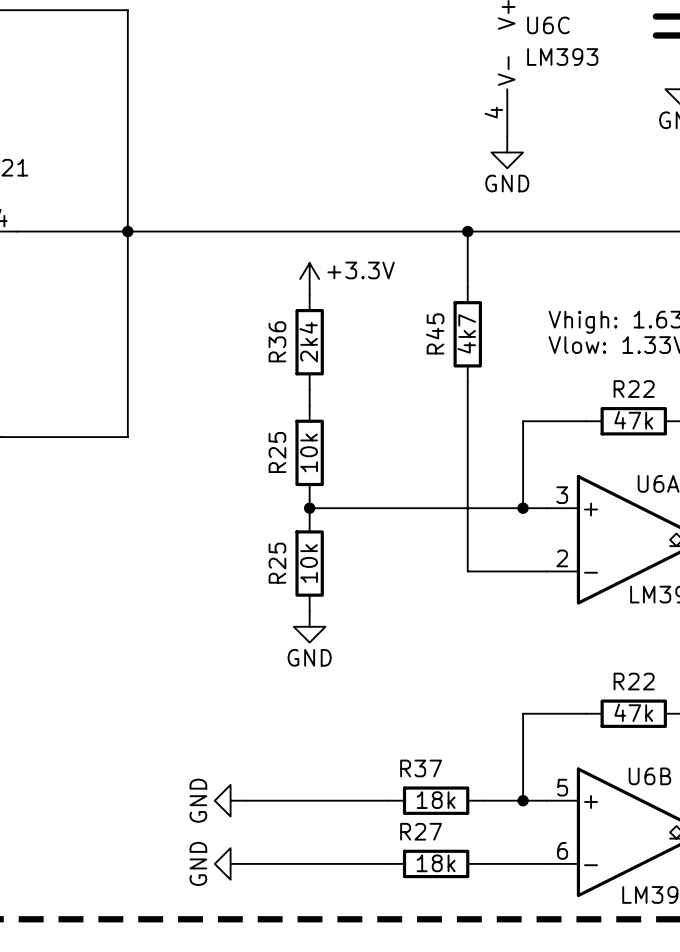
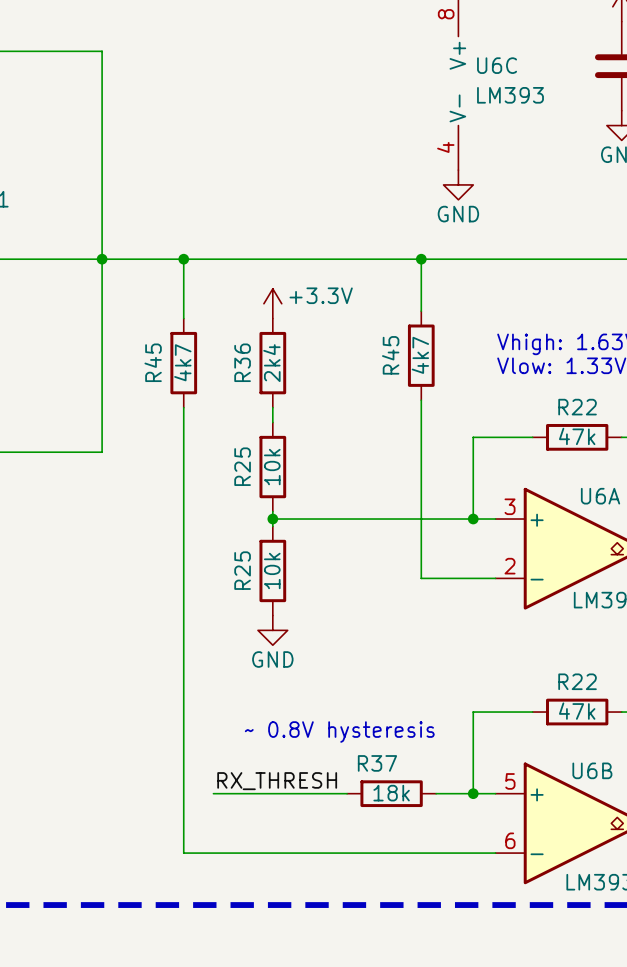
wire: none -> (183, 259) (183, 318)
junction: none -> (183, 259)
R45: none -> 4k7 (183, 363)
wire: none -> (183, 407) (183, 853) (213, 853)
text: none -> ~ 0.8V hysteresis (339, 732)
label: none -> RX_THRESH (277, 781)
power symbol: GND (230, 800) -> none
power symbol: GND (230, 863) -> none
wire: none -> (347, 853) (436, 853)
R27: 18k (436, 863) -> none

